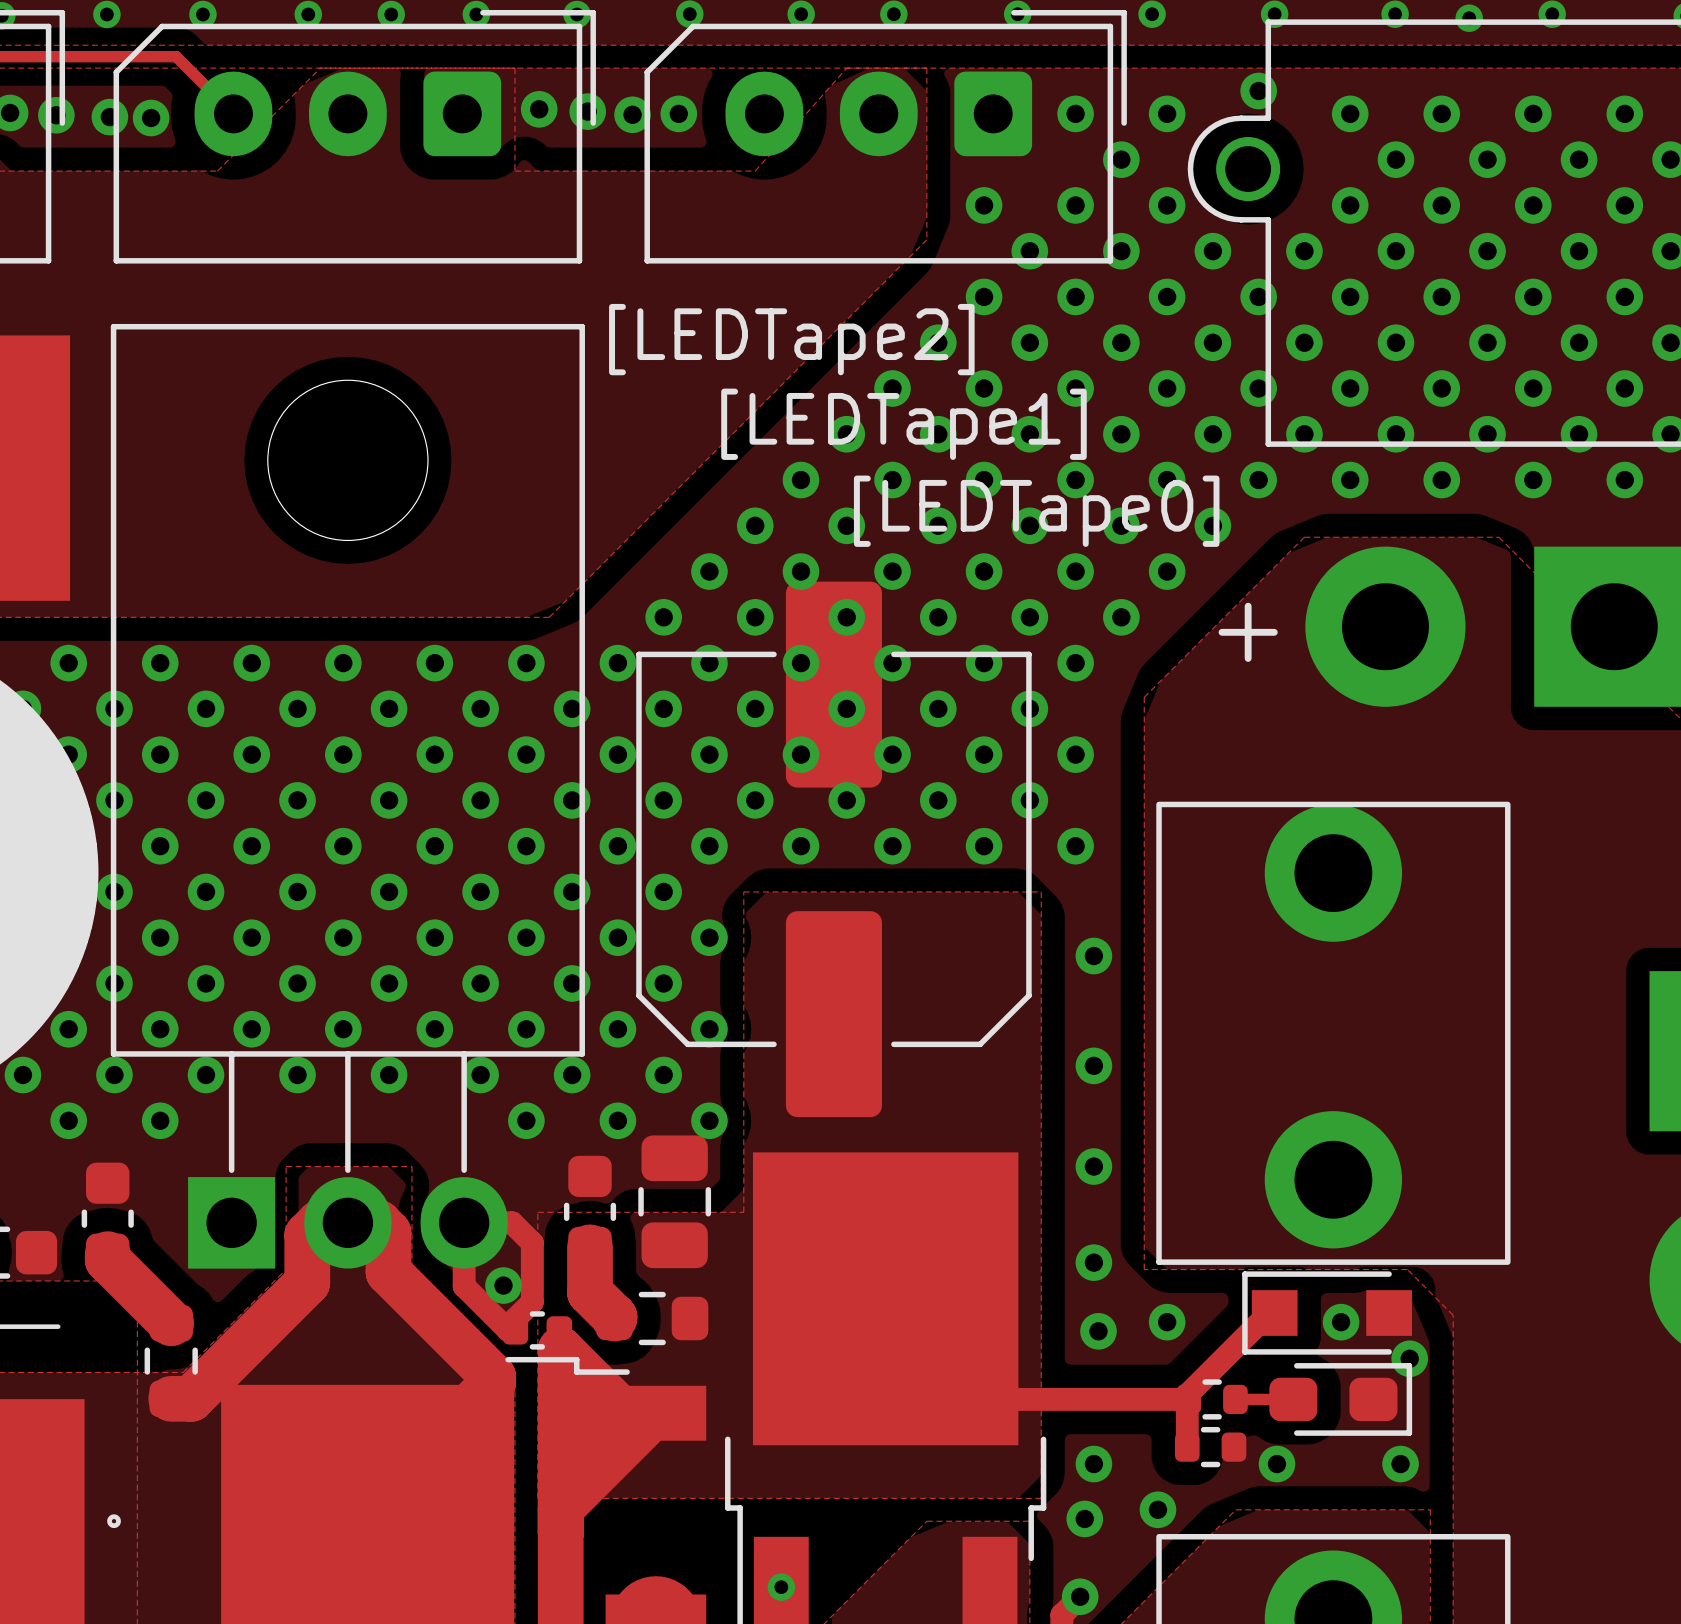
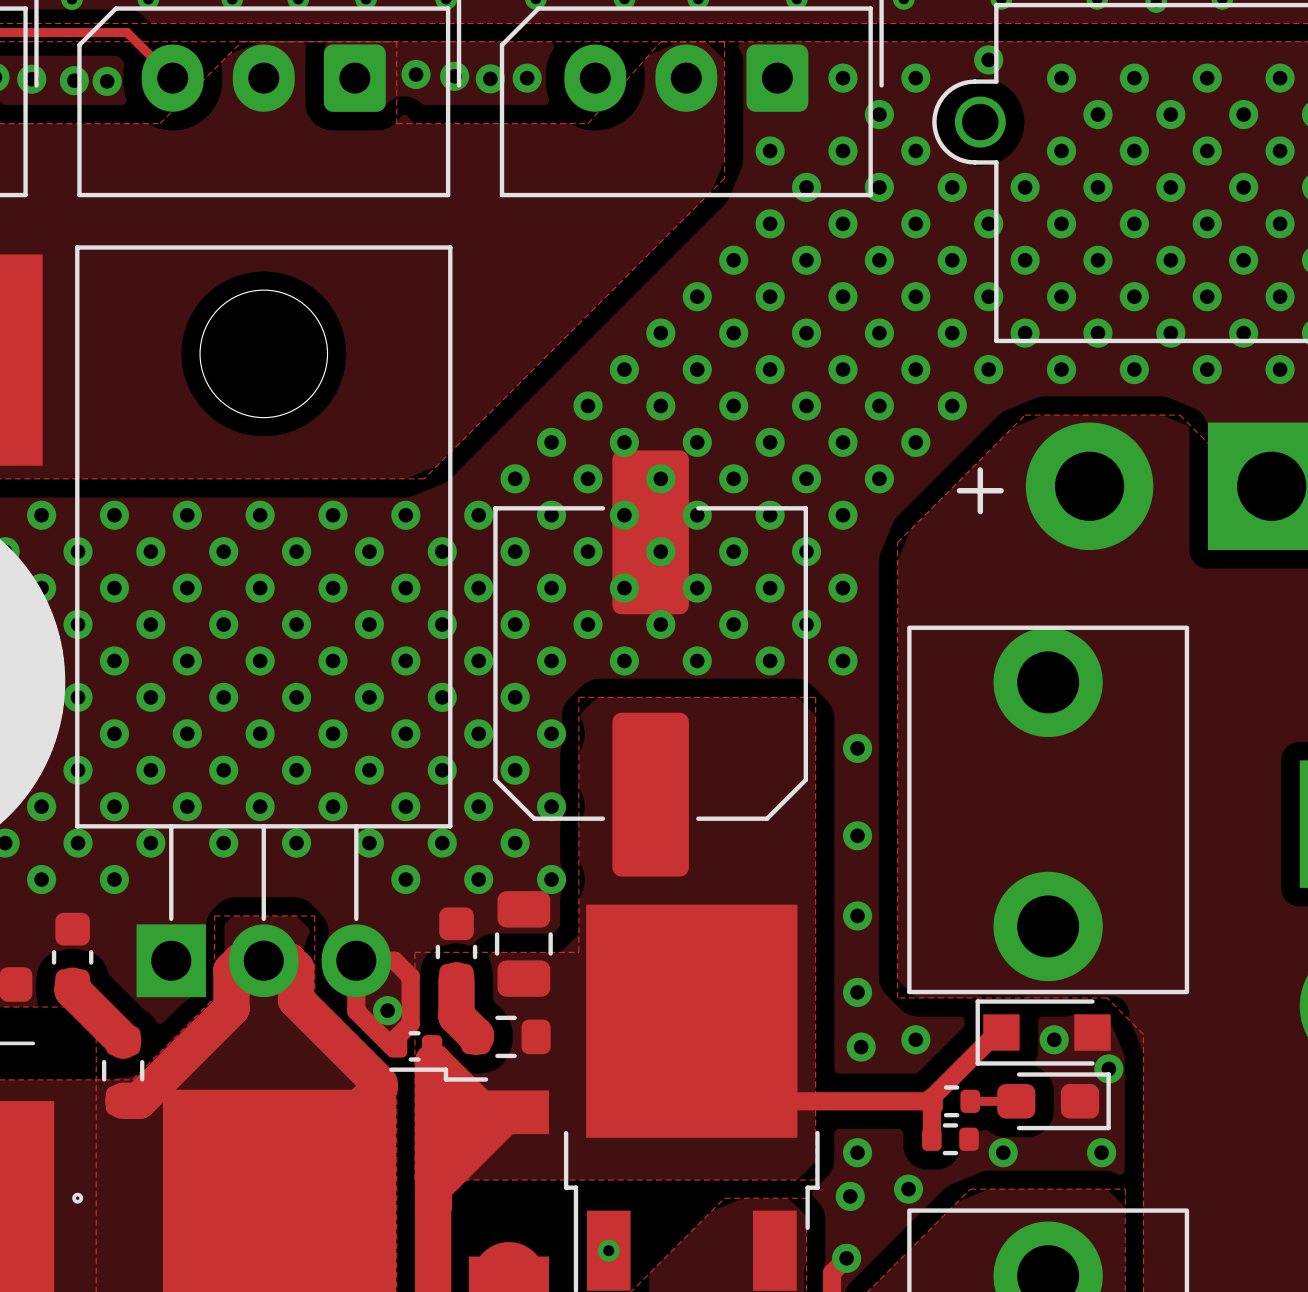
text: [LEDTape2] (791, 339) -> none
text: [LEDTape1] (903, 424) -> none
text: [LEDTape0] (1036, 511) -> none

